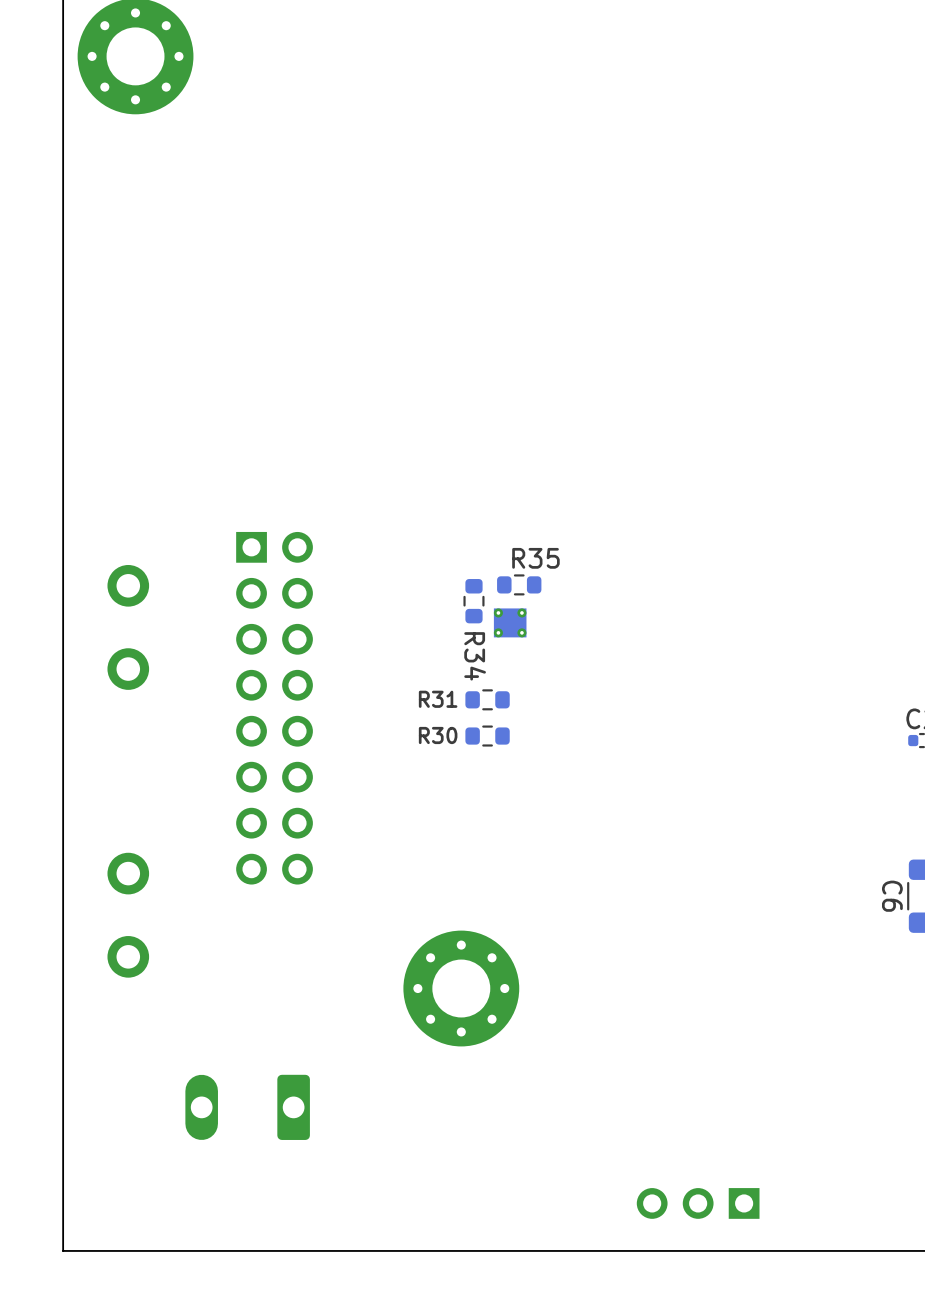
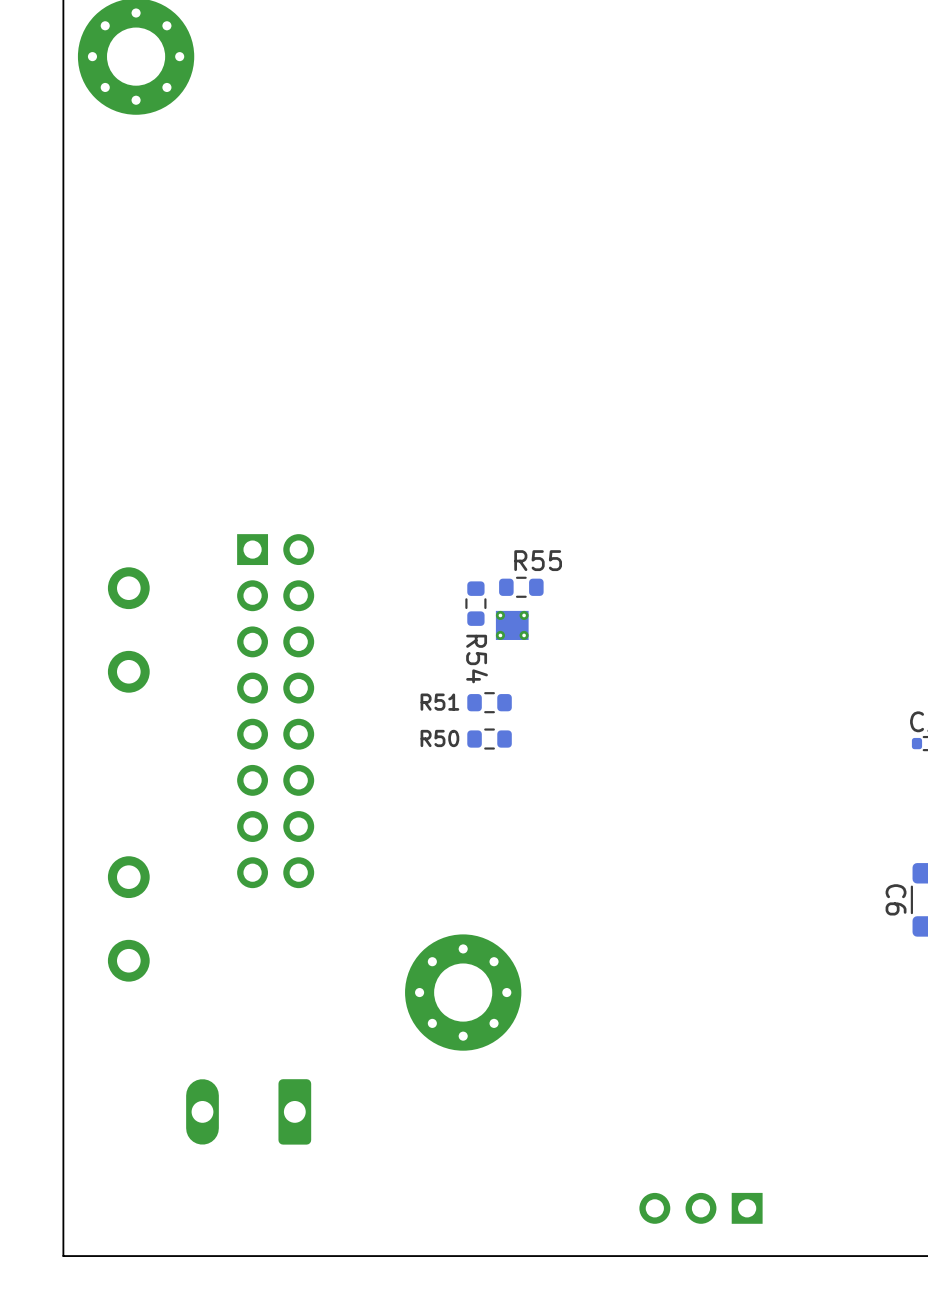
R35 name: R35 (535, 558) -> R55 (538, 560)
R34 name: R34 (475, 656) -> R54 (477, 659)
R31 name: R31 (438, 699) -> R51 (439, 702)
R30 name: R30 (438, 735) -> R50 (439, 738)

